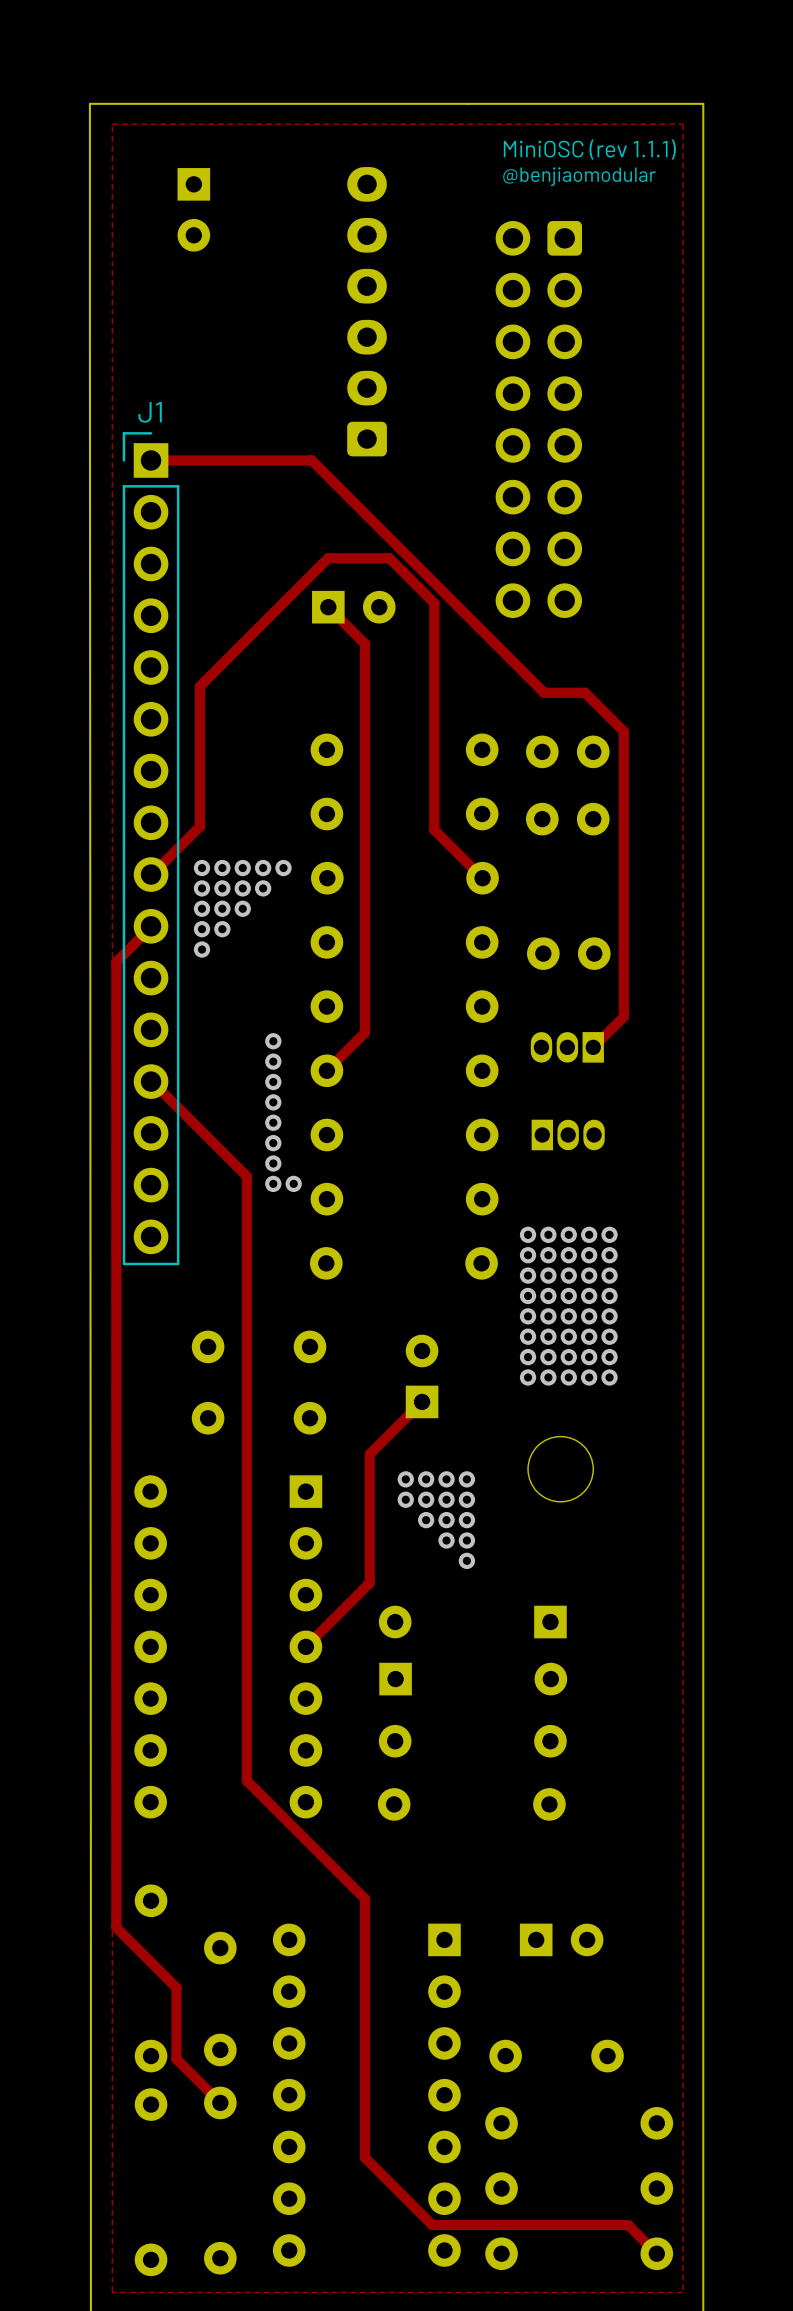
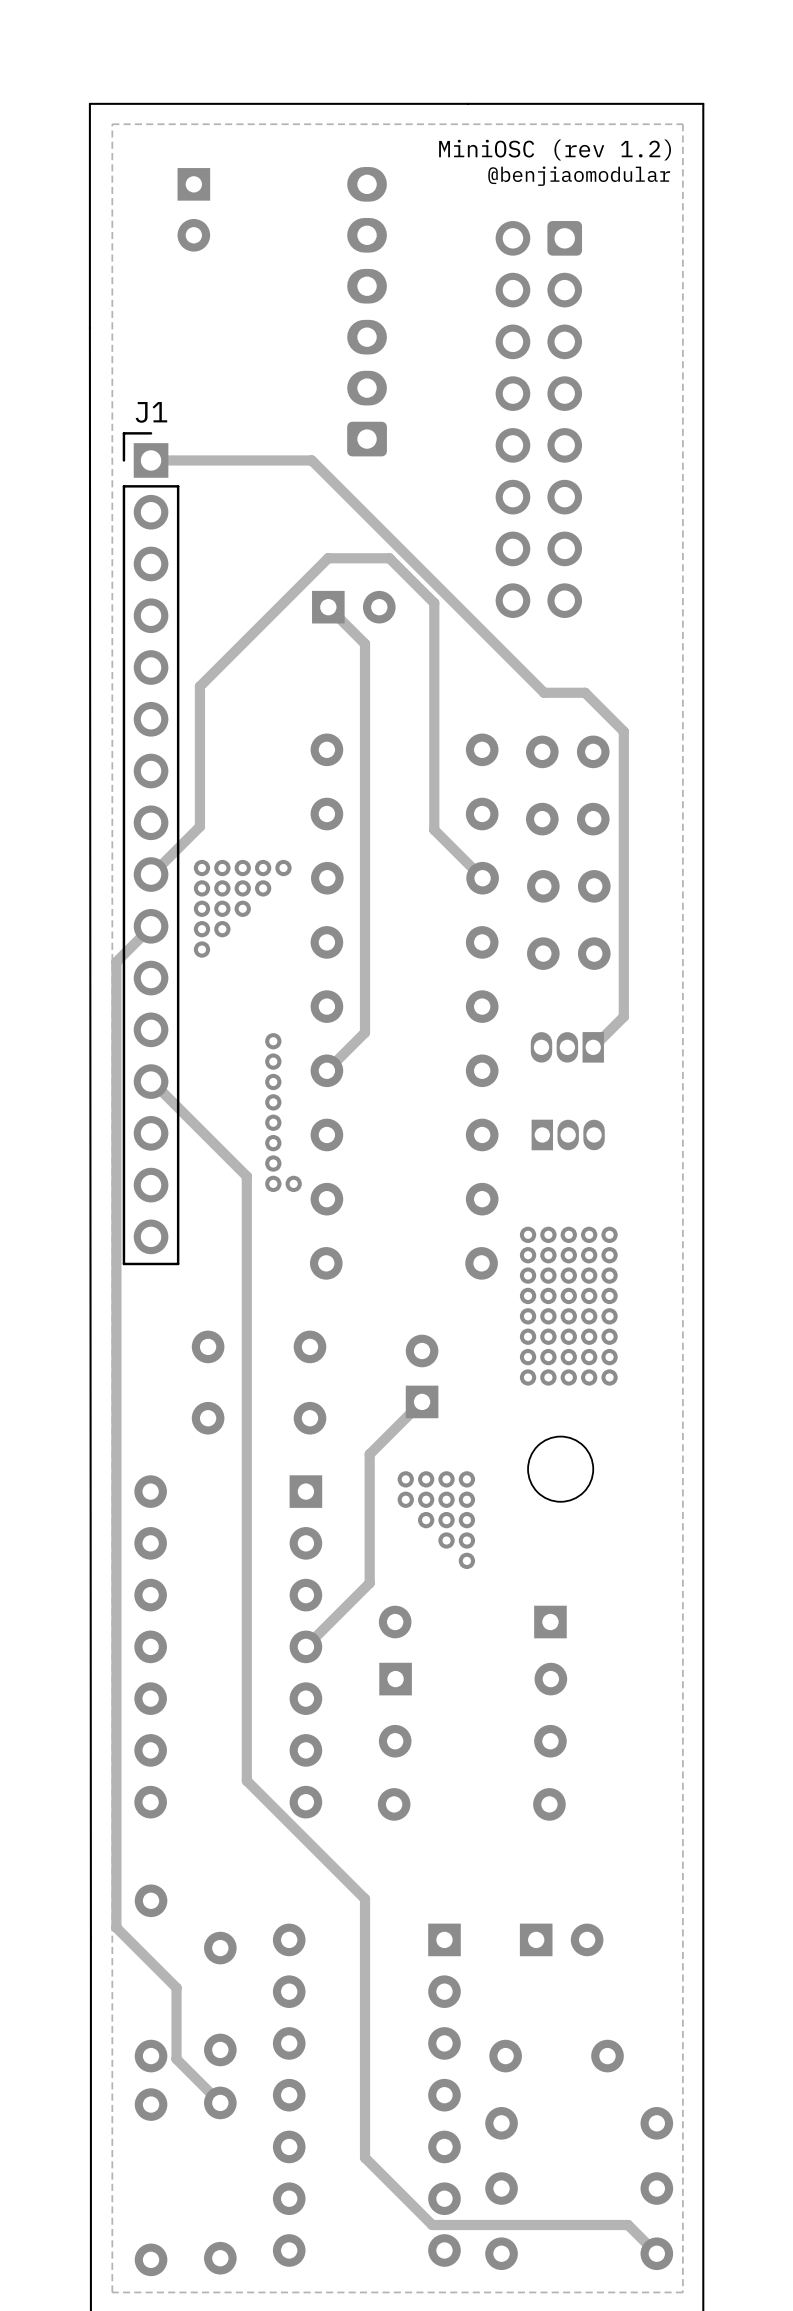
text: MiniOSC (rev 1.1.1) (589, 149) -> MiniOSC (rev 1.2) (555, 149)
part: none -> (568, 886)

